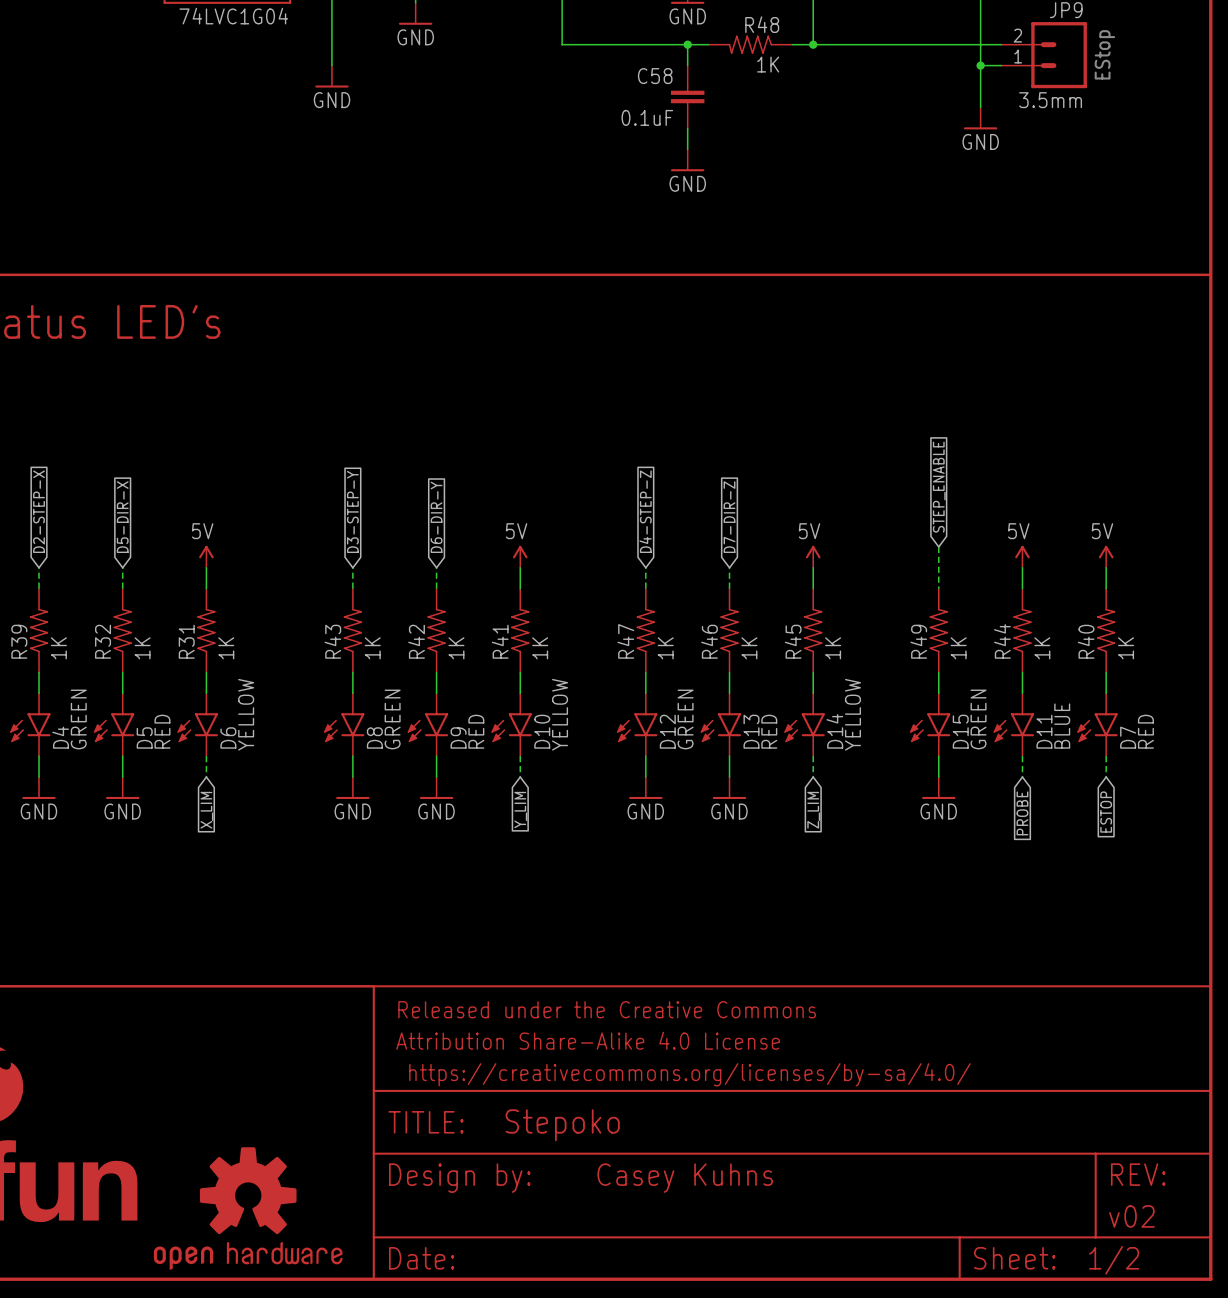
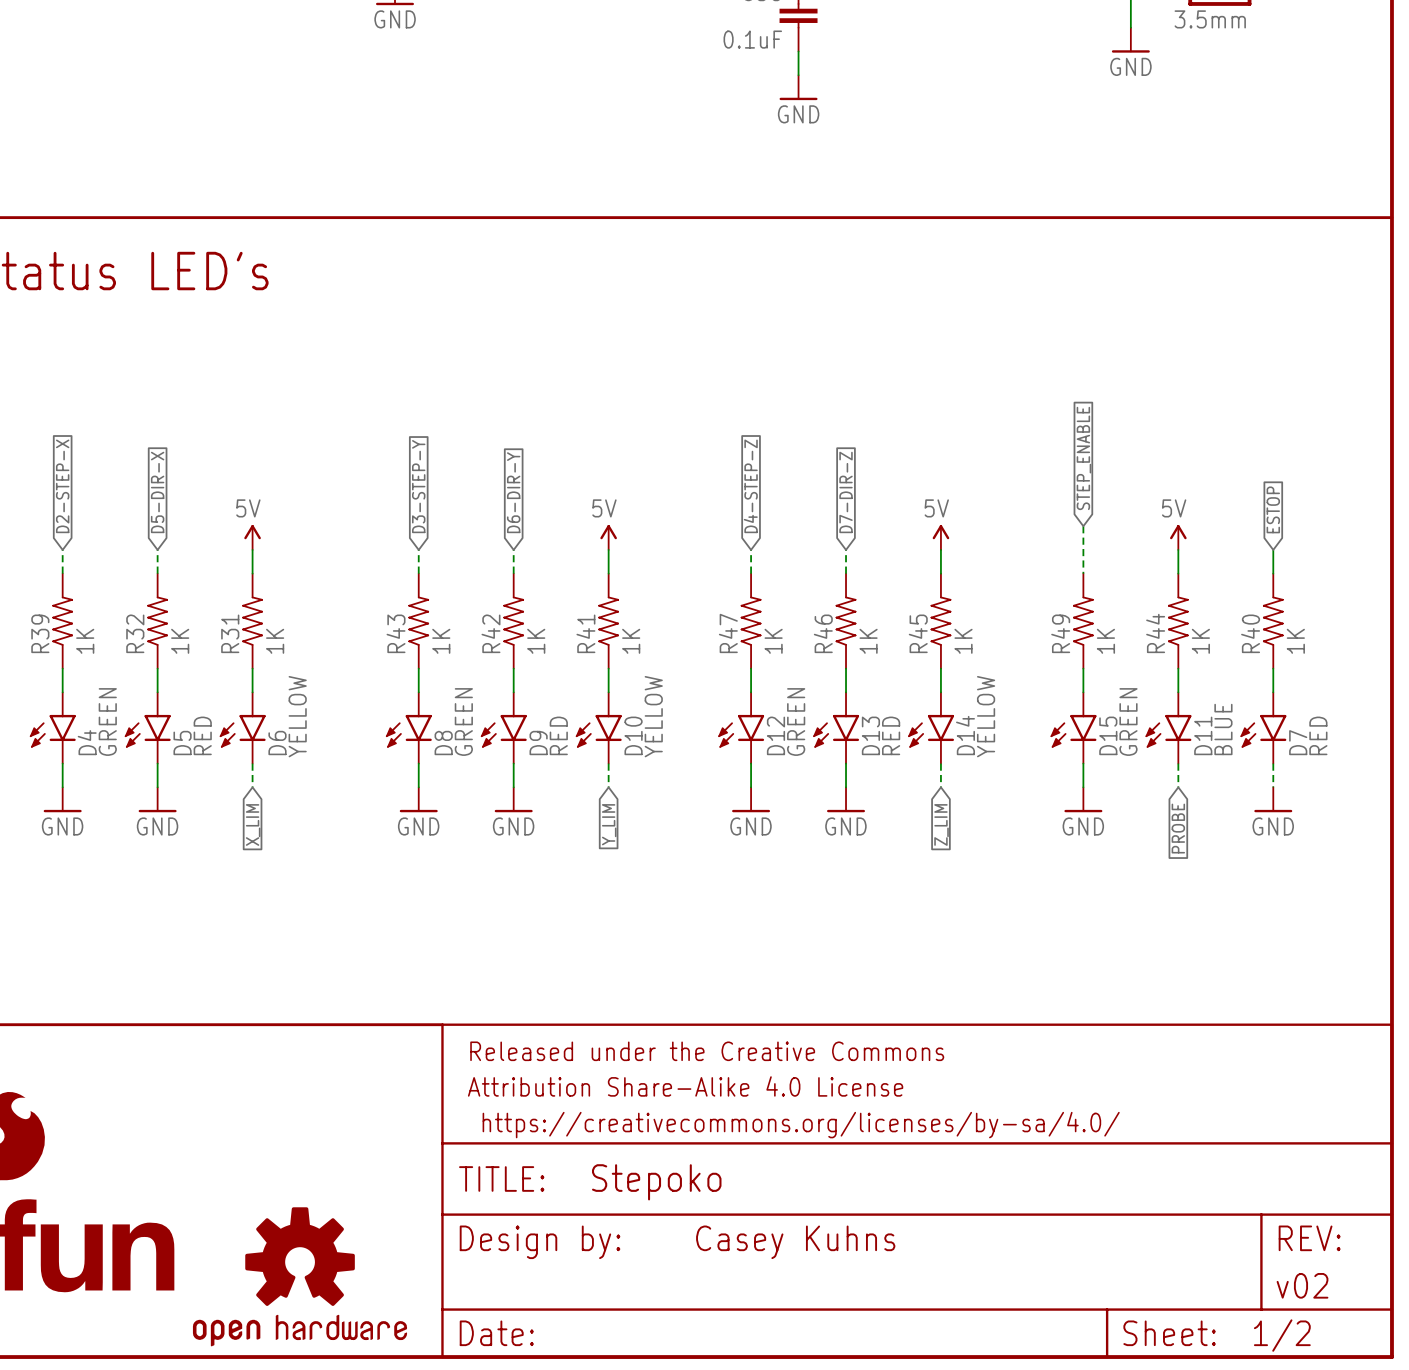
global label: none -> ESTOP (1273, 509)
power symbol: 5V (1106, 556) -> none
power symbol: none -> GND (1273, 799)
global label: ESTOP (1106, 812) -> none

